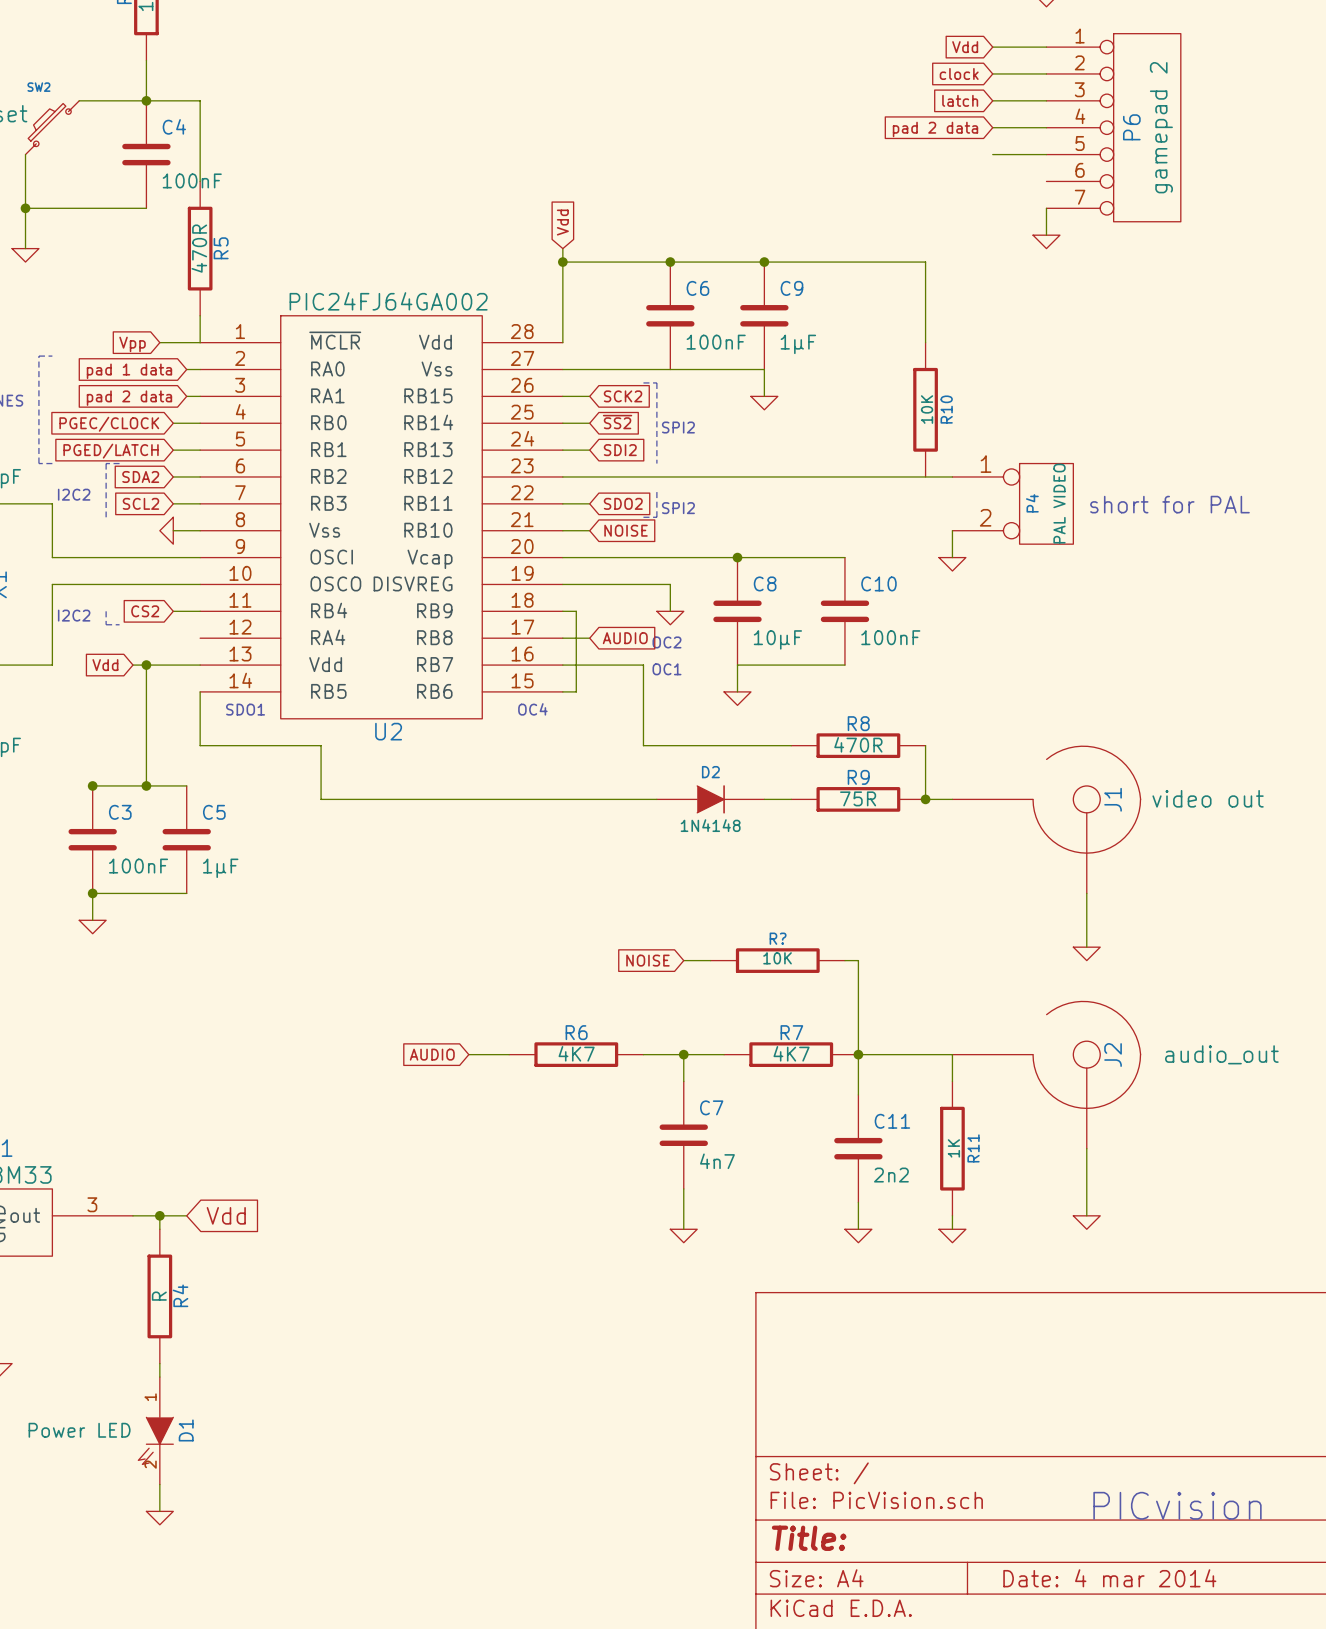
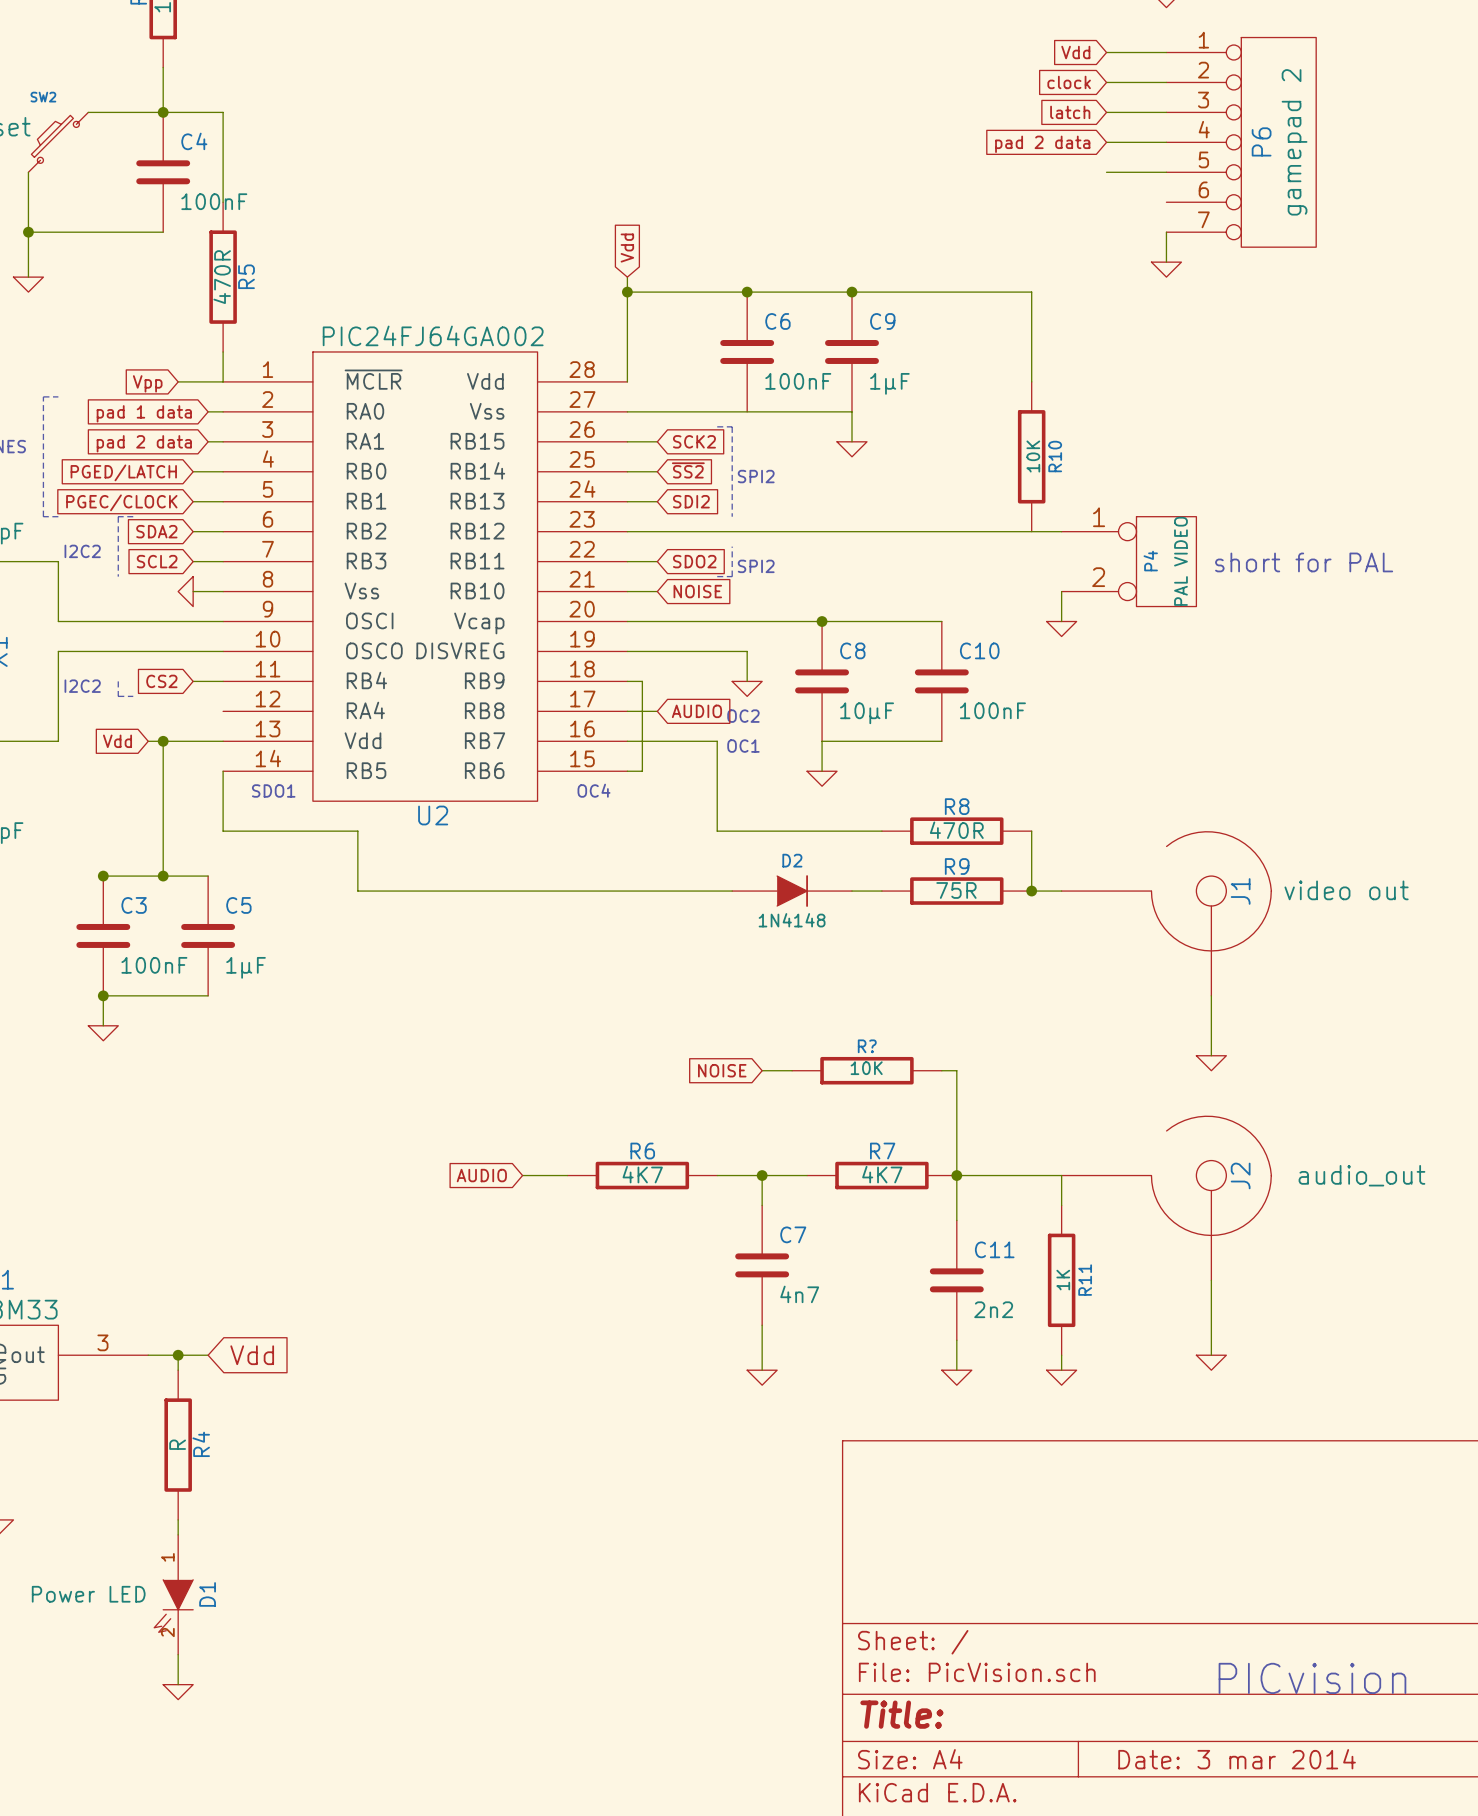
global label: PGEC/CLOCK (109, 424) -> PGED/LATCH (123, 472)
global label: PGED/LATCH (111, 451) -> PGEC/CLOCK (121, 502)
title block: Date: 4 mar 2014 (1109, 1578) -> Date: 3 mar 2014 (1237, 1759)

